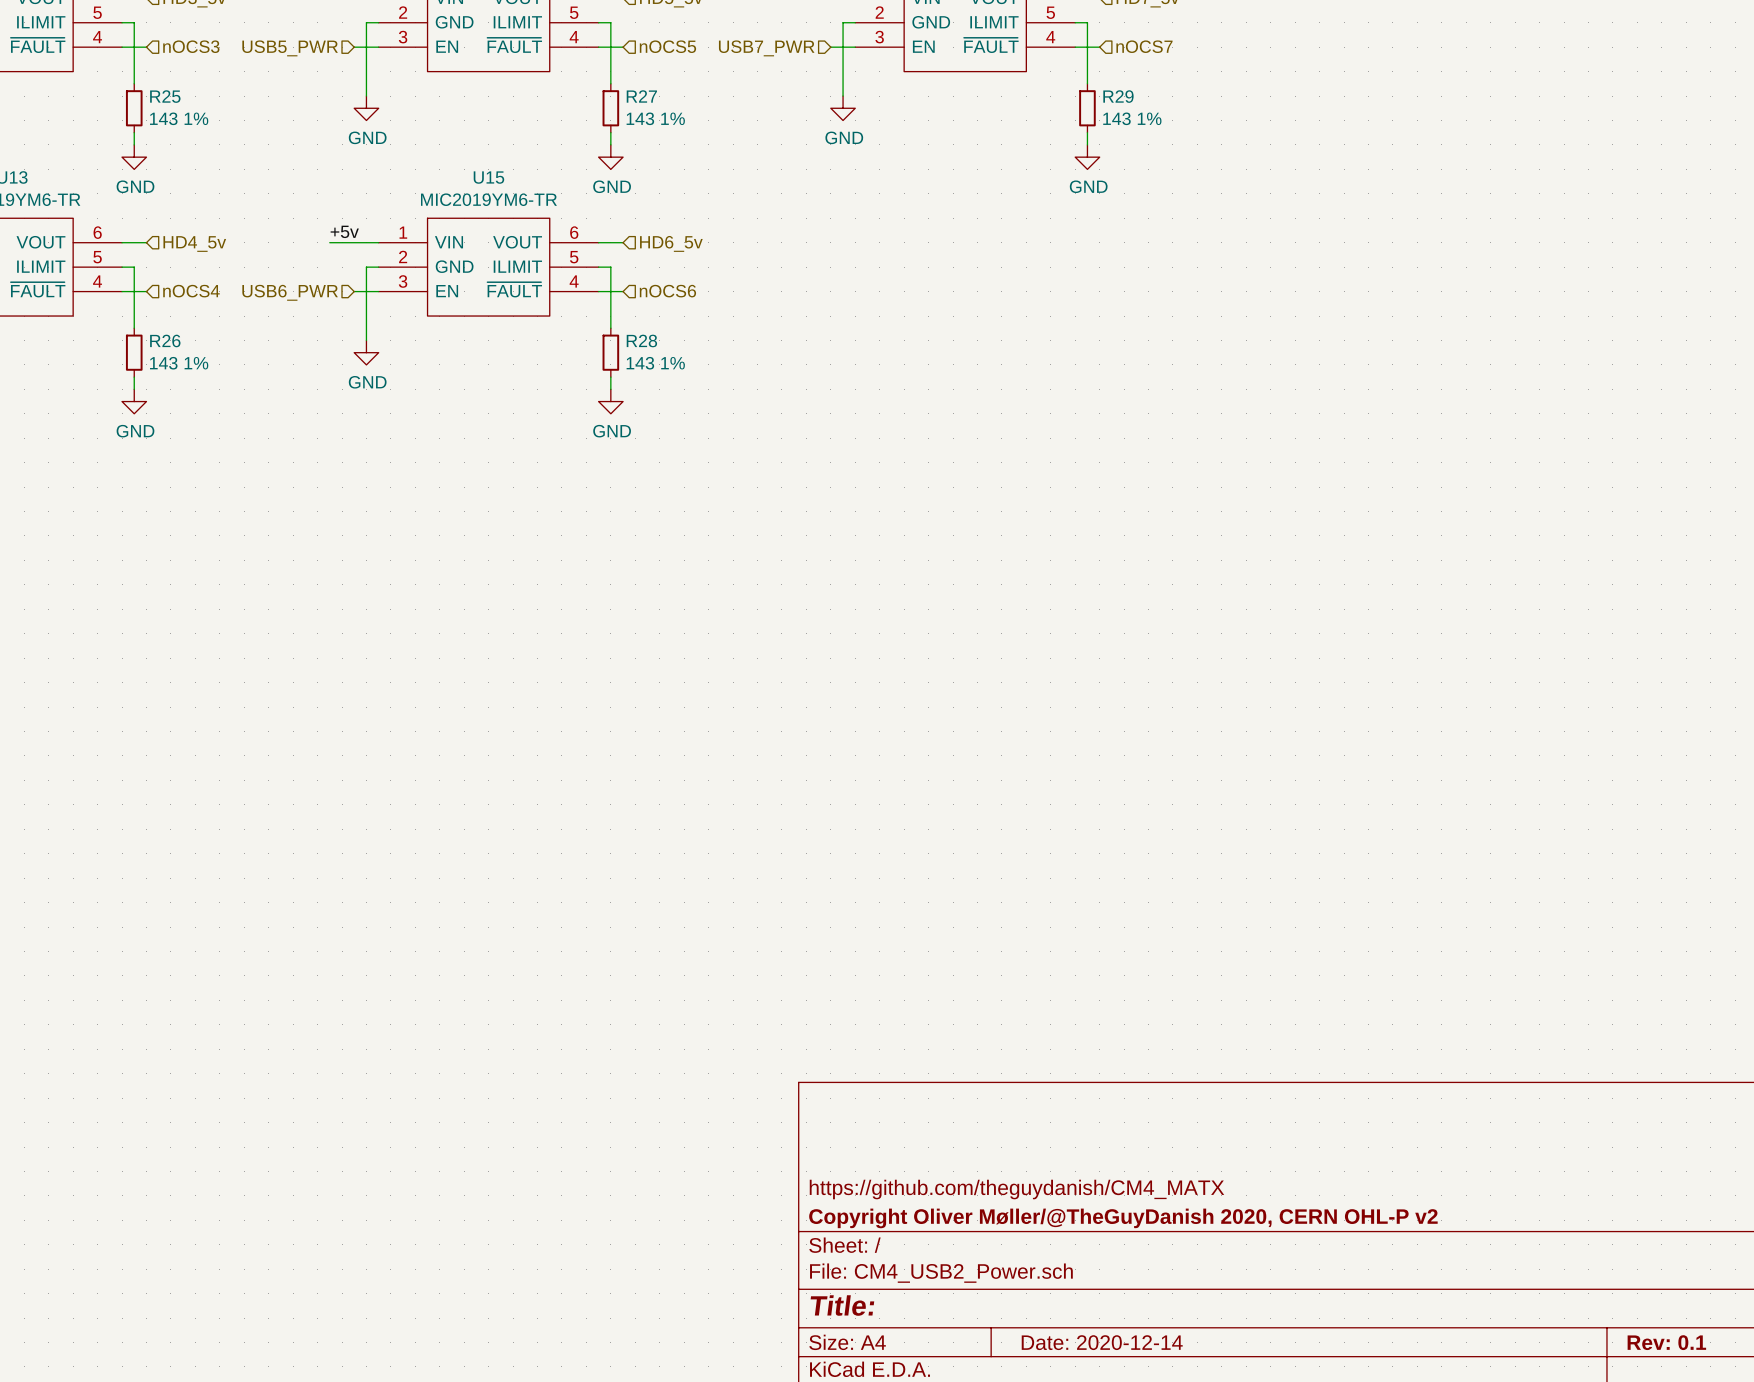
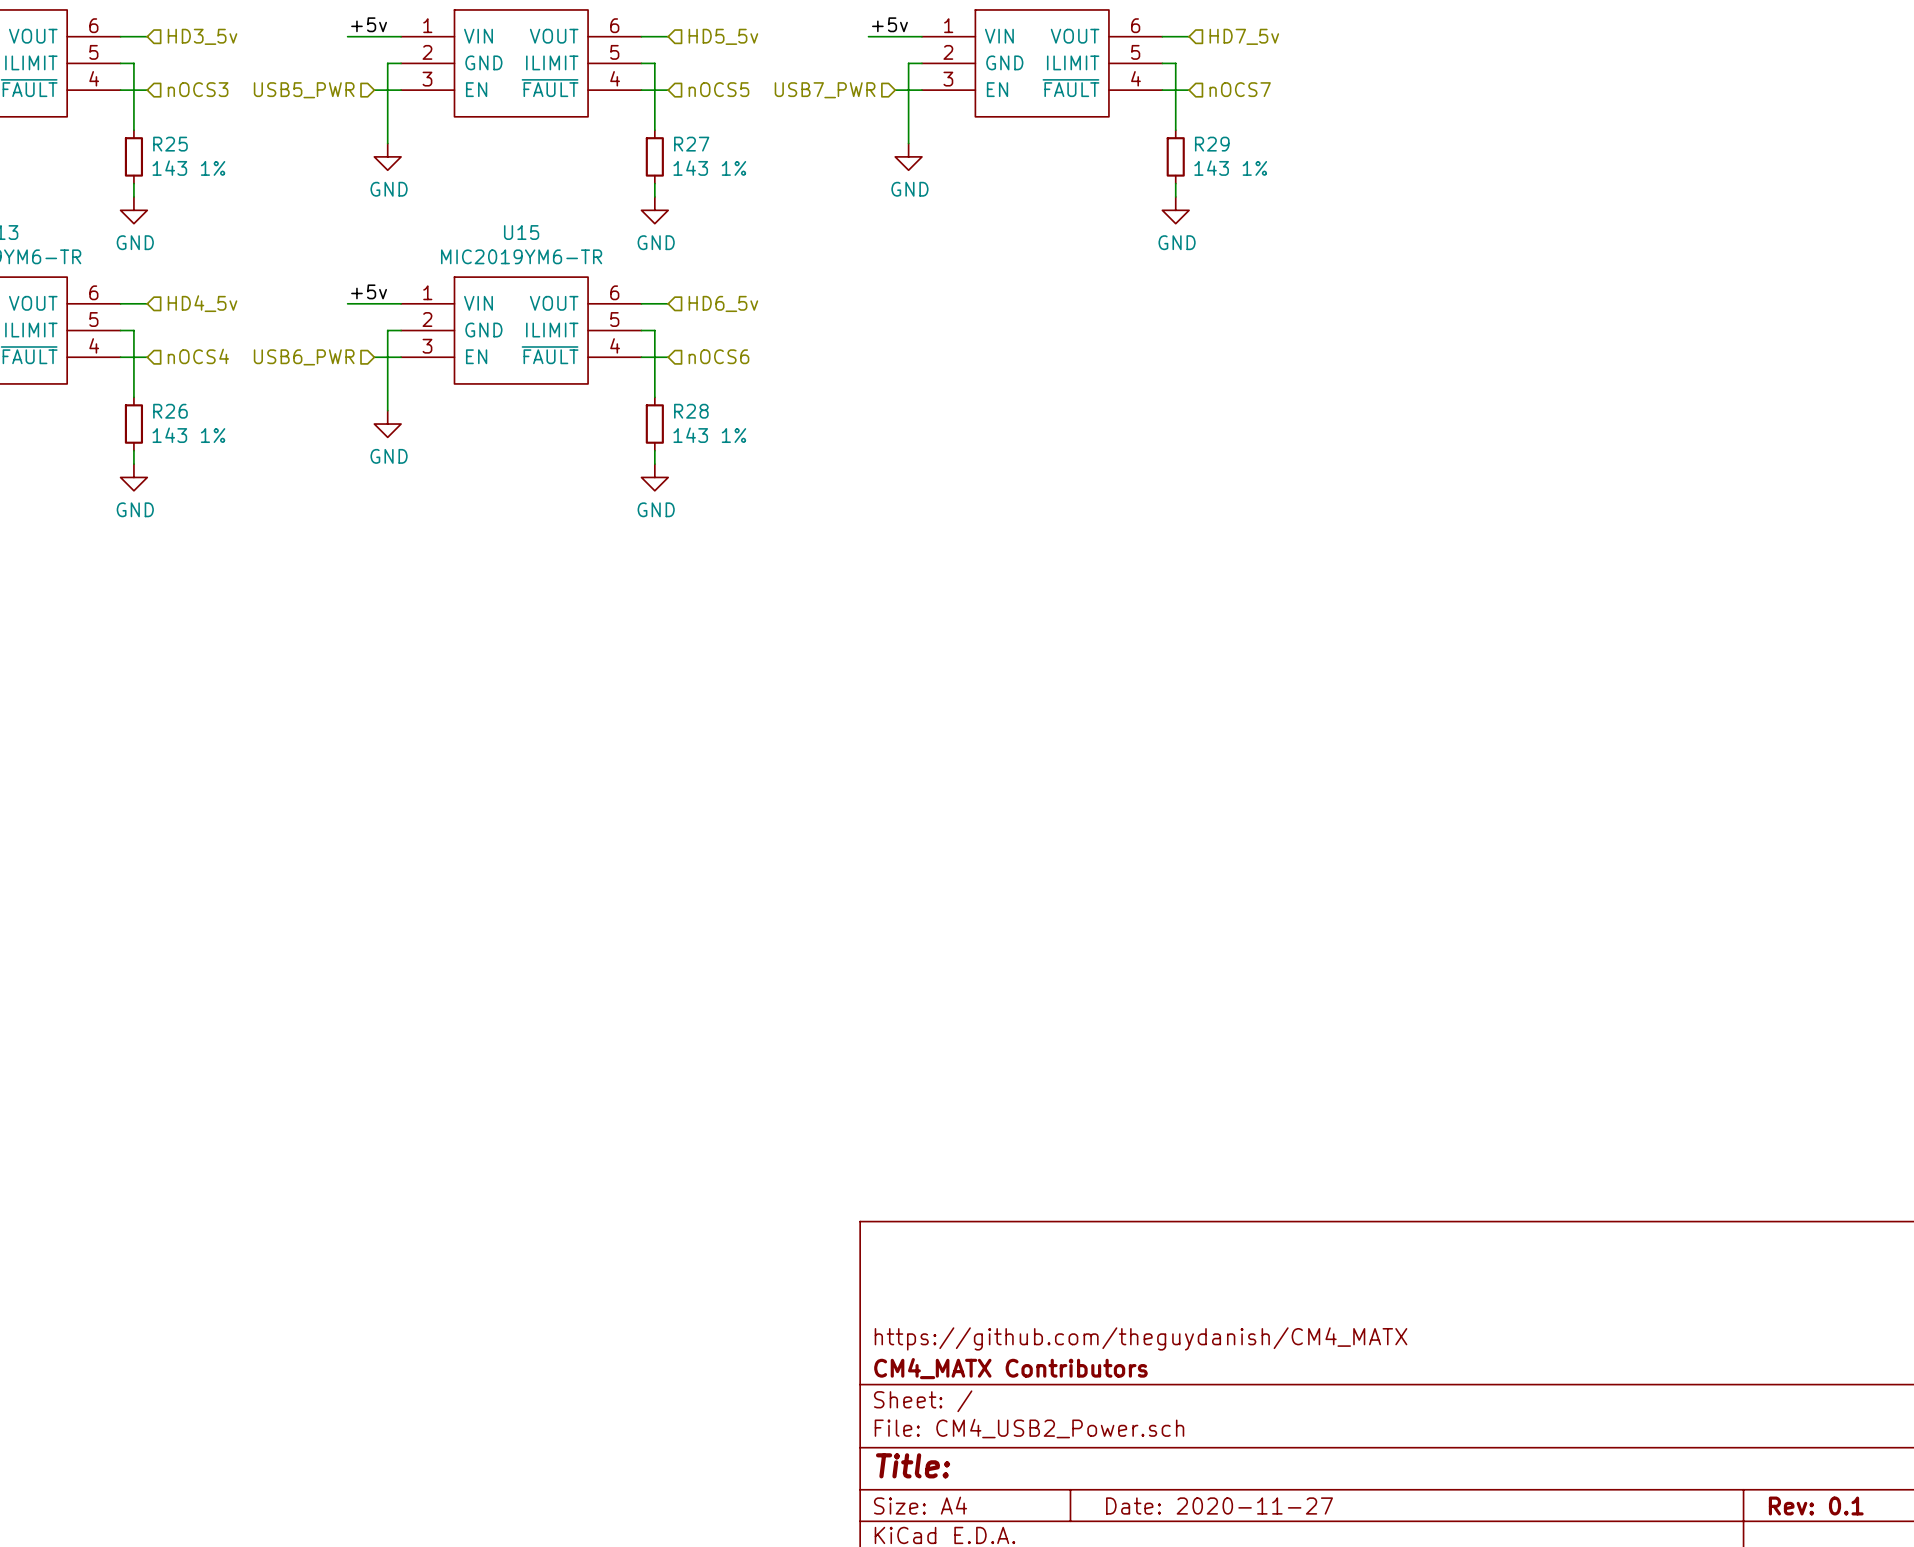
title block: Copyright Oliver Møller/@TheGuyDanish 2020, CERN OHL-P v2 (1123, 1218) -> CM4_MATX Contributors (1010, 1368)
title block: Date: 2020-12-14 (1102, 1342) -> Date: 2020-11-27 (1219, 1506)

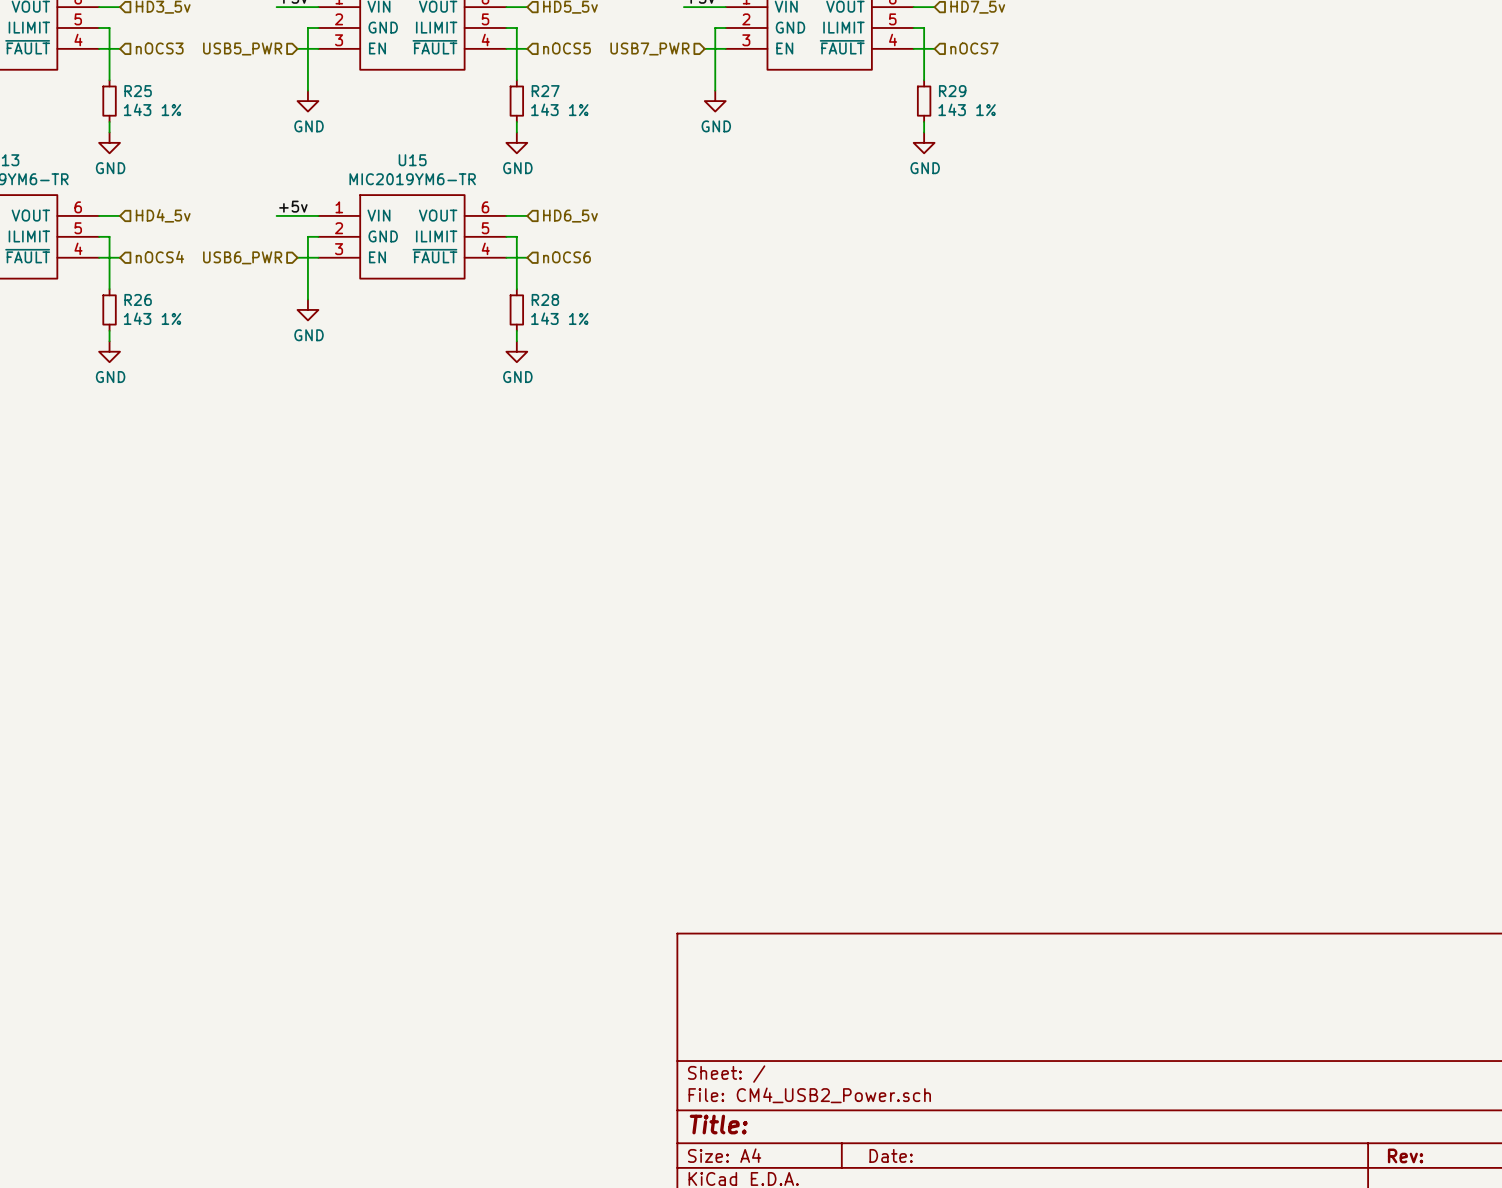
title block: https://github.com/theguydanish/CM4_MATX (1141, 1338) -> none
title block: CM4_MATX Contributors (1010, 1368) -> none
title block: Date: 2020-11-27 (1219, 1506) -> Date: (891, 1155)
title block: Rev: 0.1 (1816, 1506) -> Rev: (1405, 1155)

